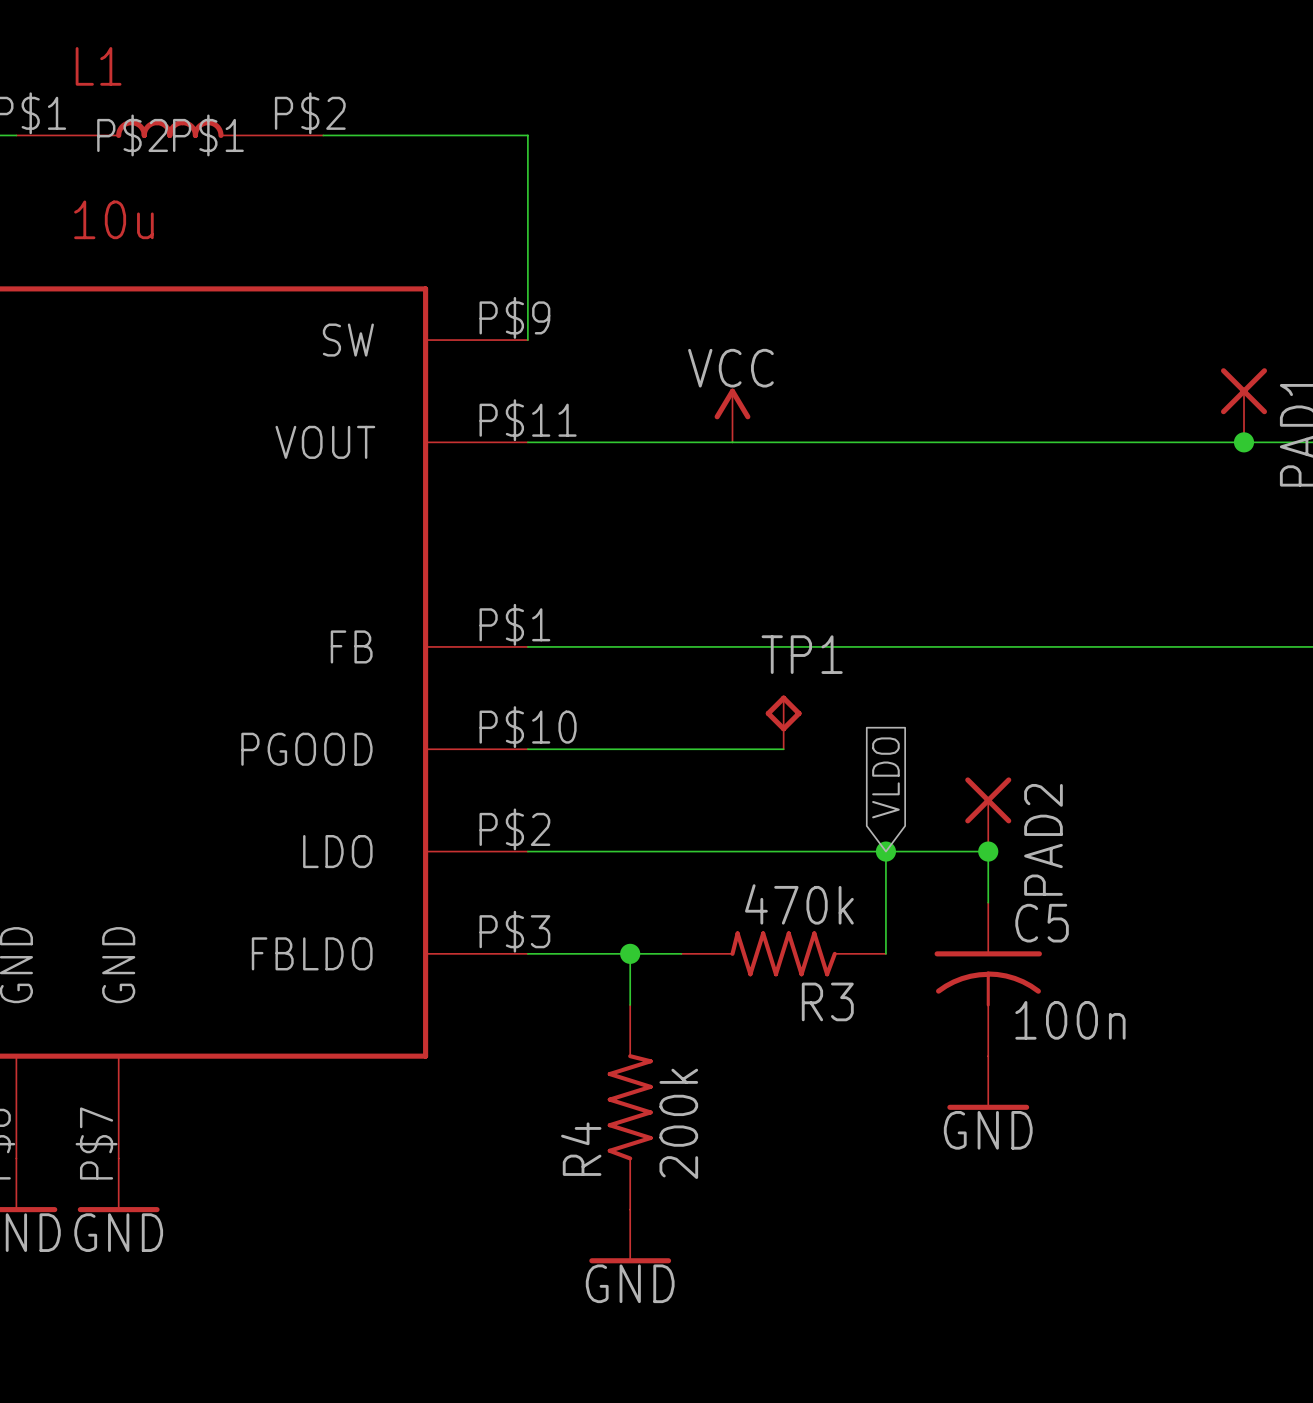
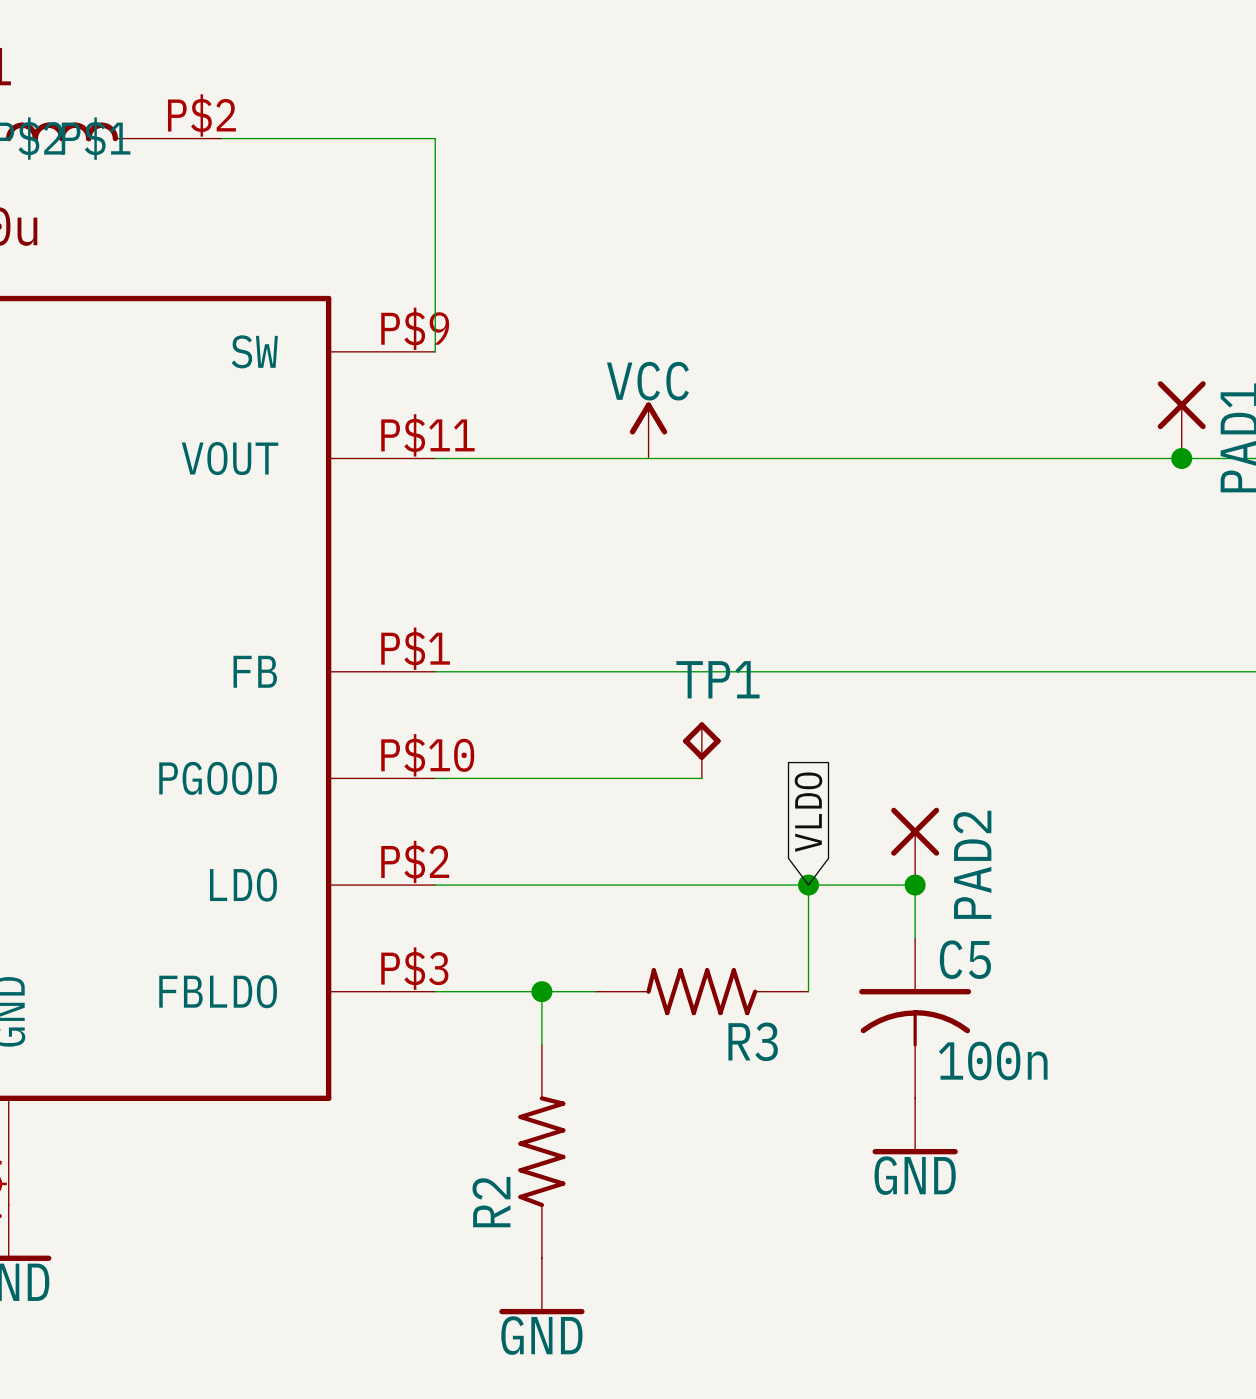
R3 value: 470k (799, 904) -> none
R4 value: 200k (678, 1123) -> none
R4 name: R4 (581, 1149) -> R2 (491, 1202)

